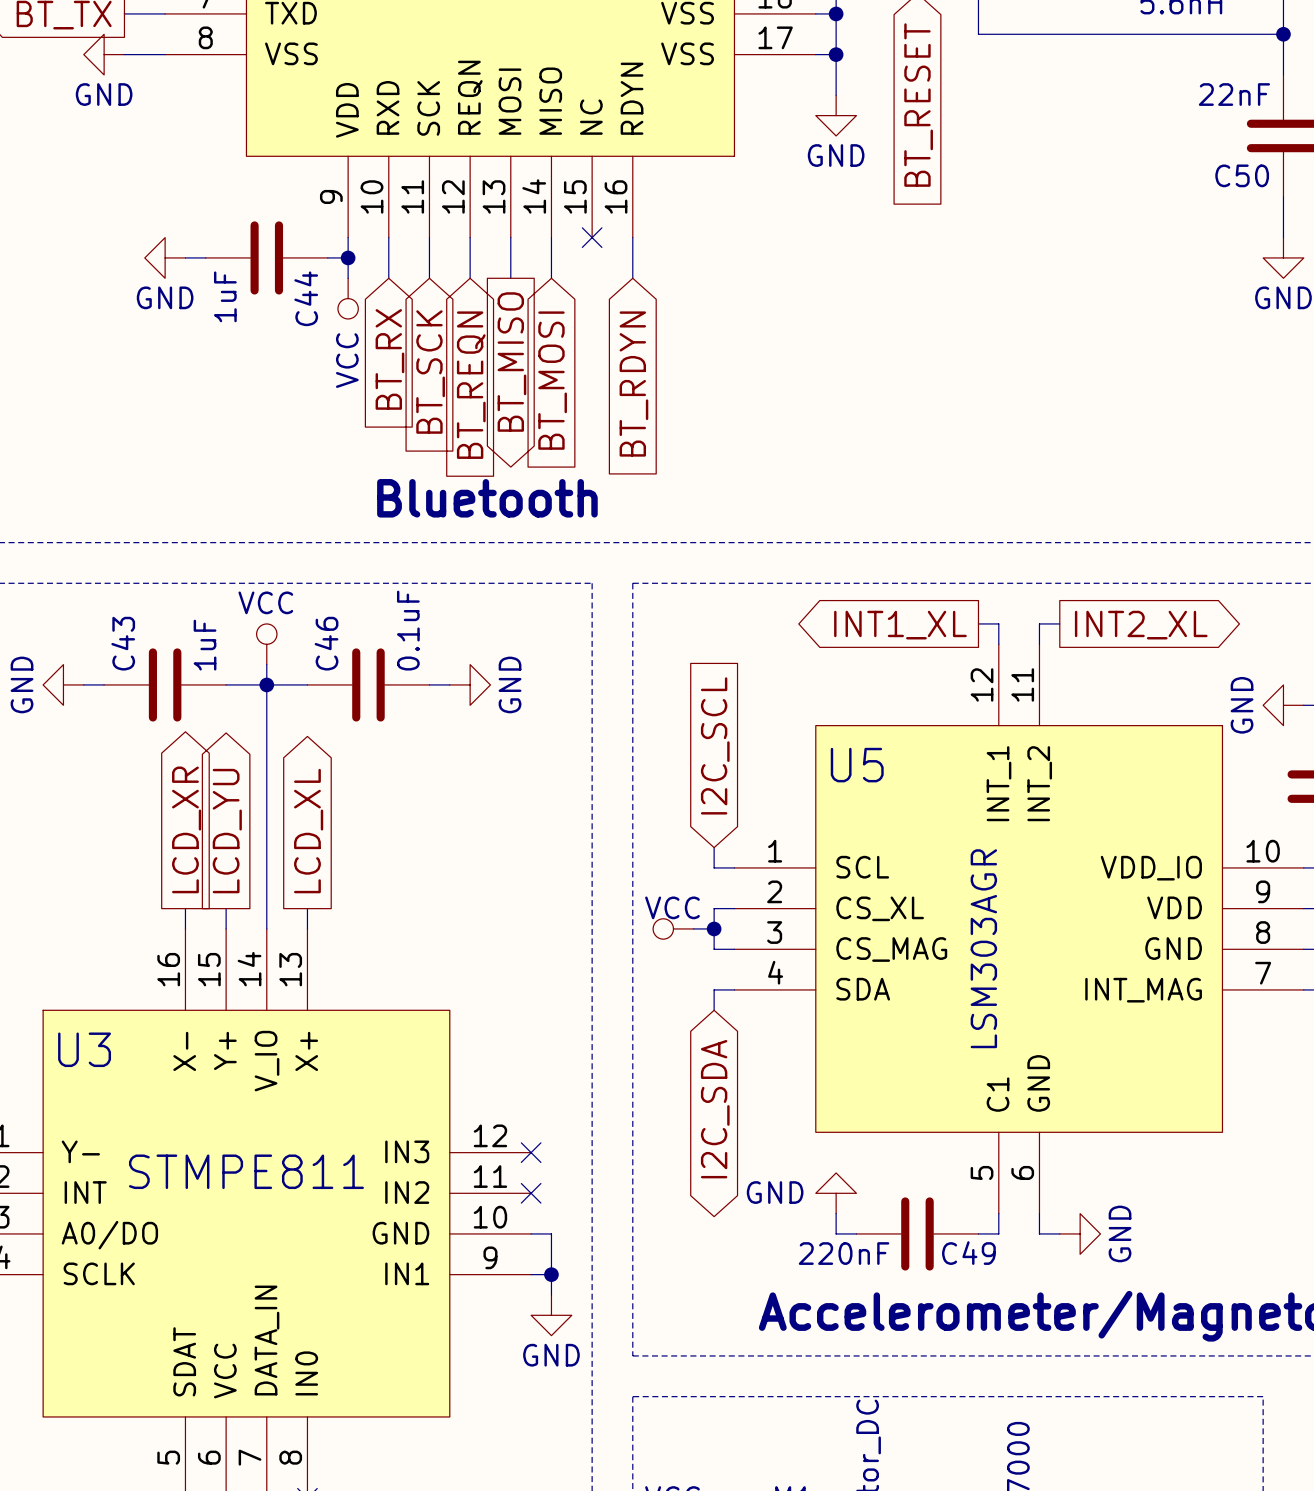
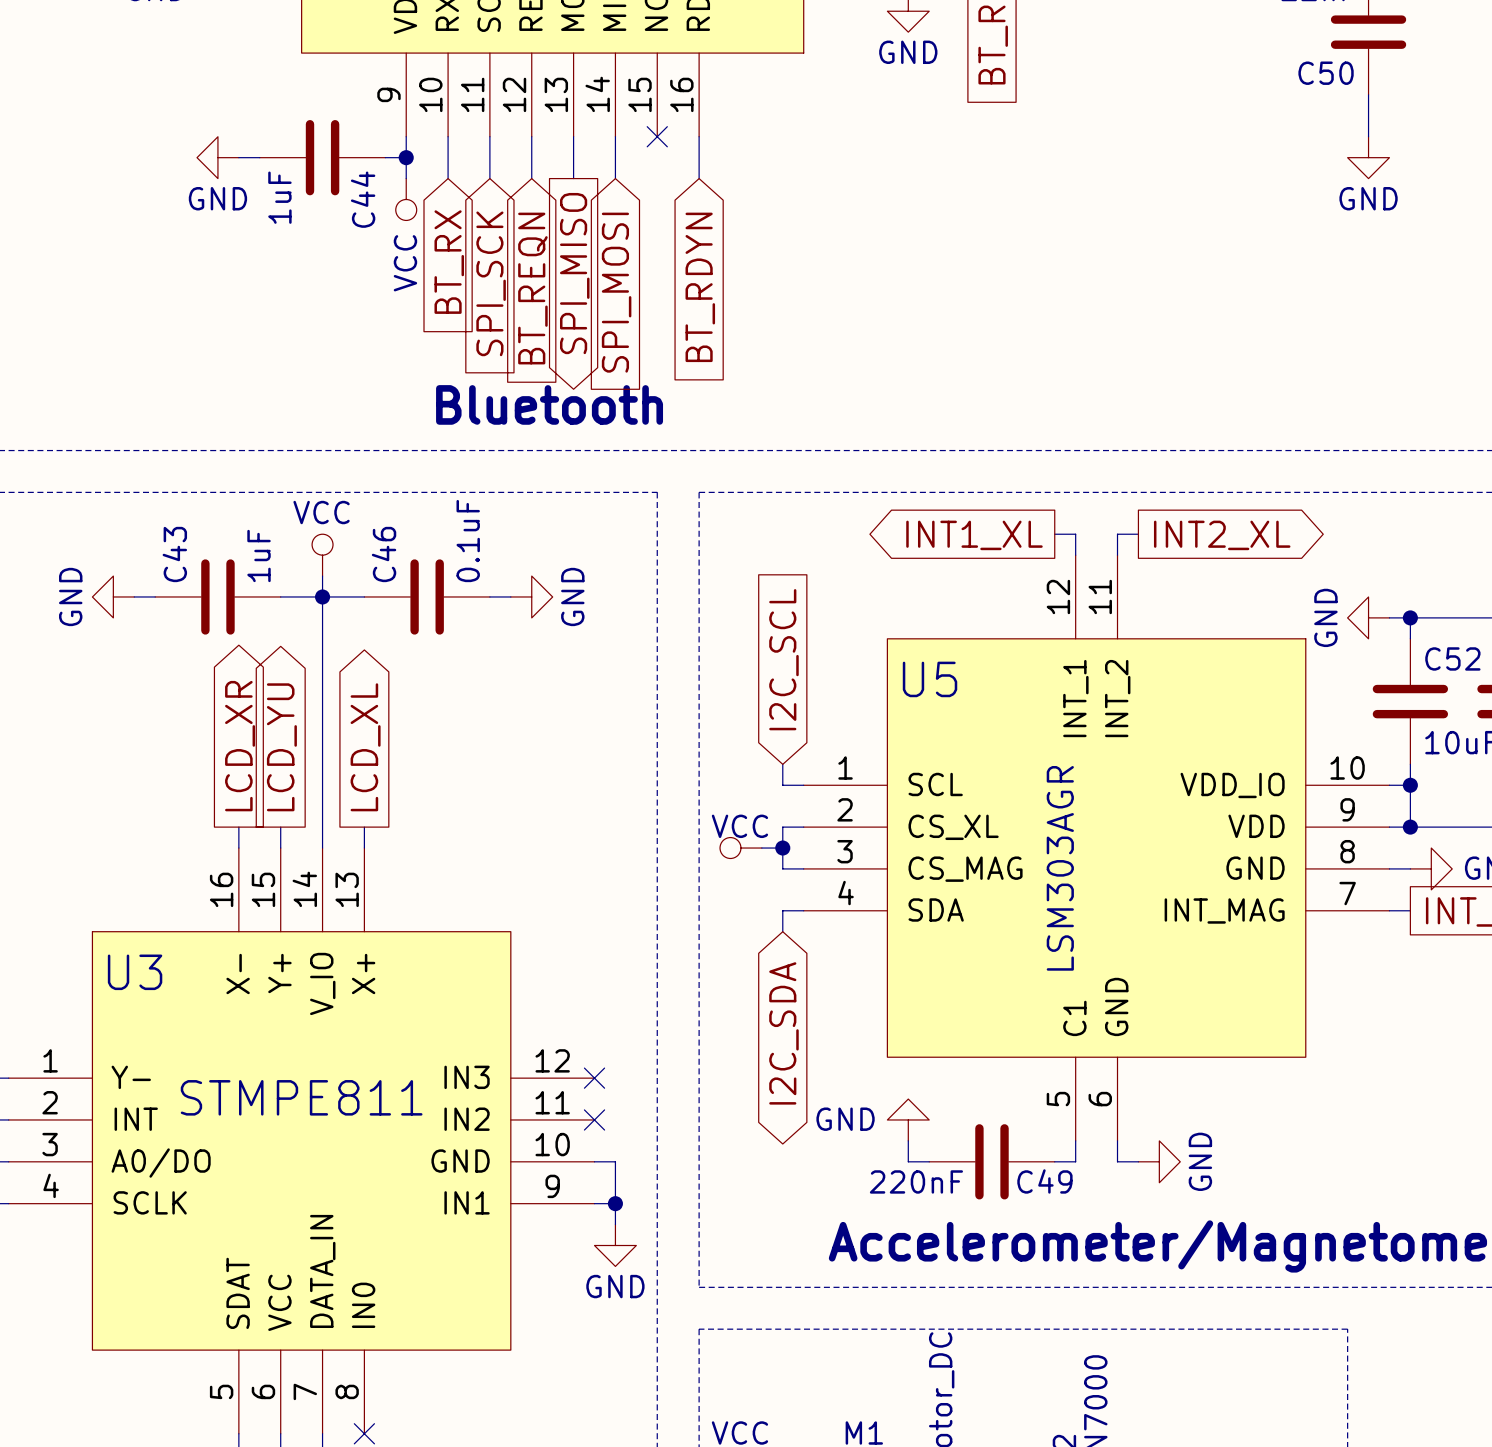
global label: BT_MISO (511, 362) -> SPI_MISO (574, 273)
global label: BT_SCK (430, 372) -> SPI_SCK (491, 283)
global label: BT_MOSI (552, 380) -> SPI_MOSI (616, 292)

